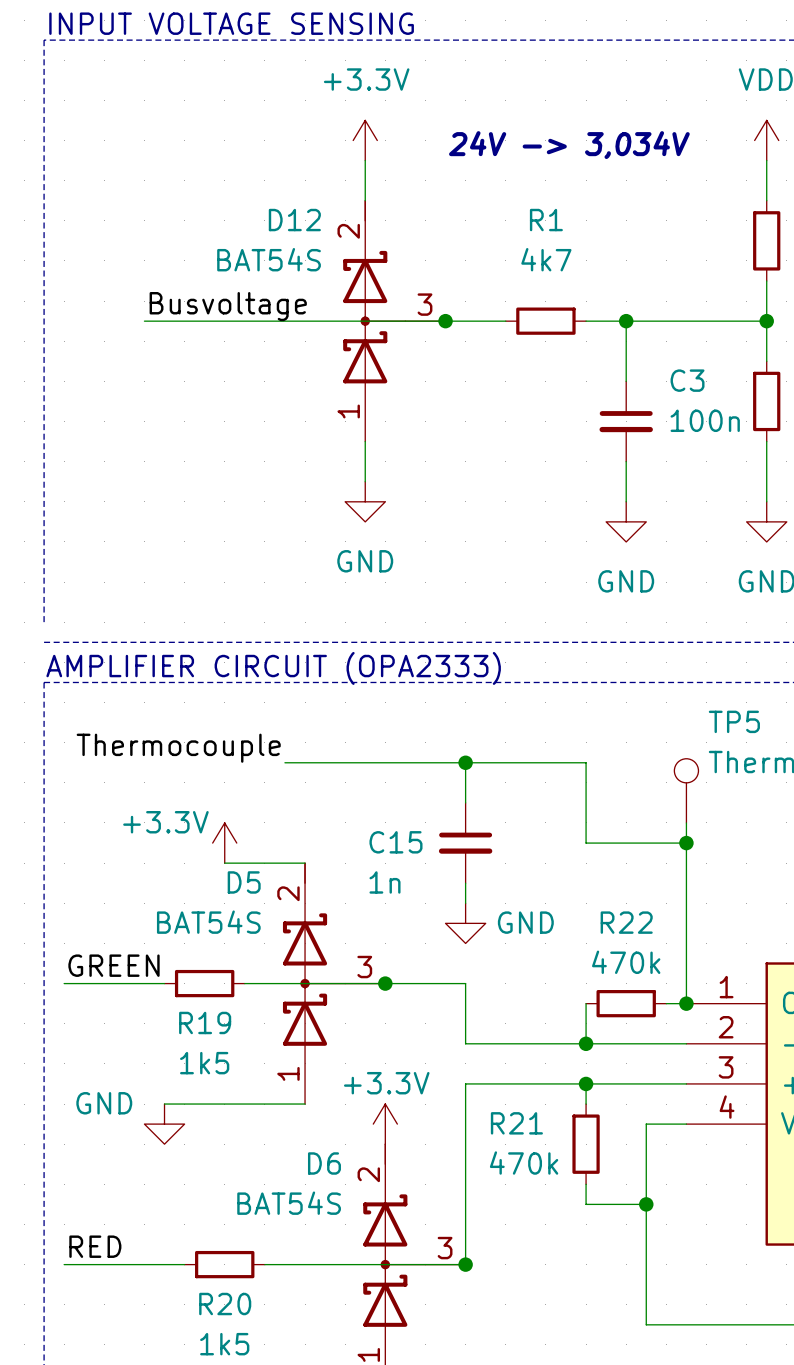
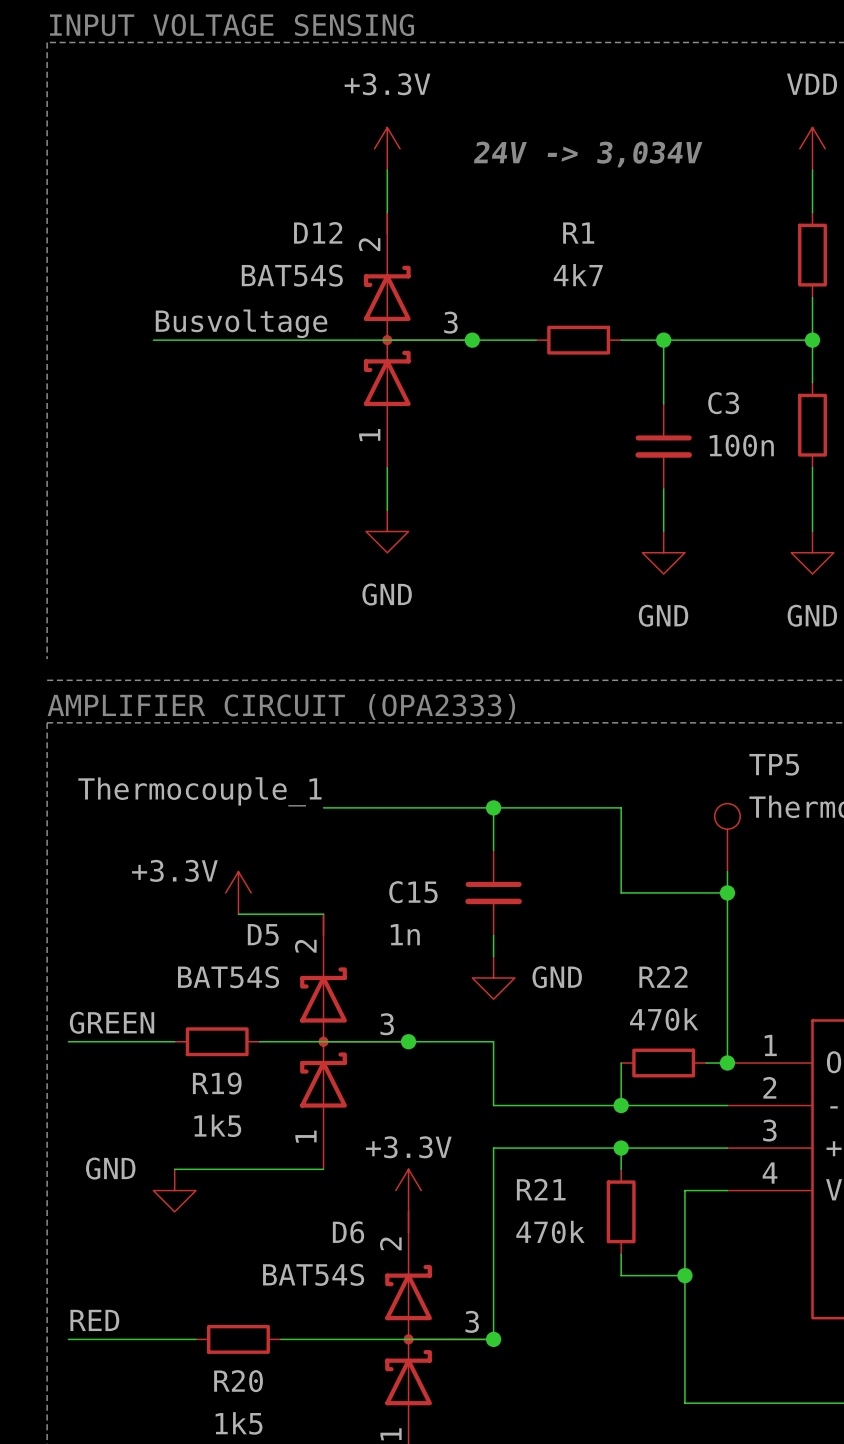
label: Thermocouple (178, 748) -> Thermocouple_1 (199, 791)
wire: (284, 762) (305, 762) -> none

